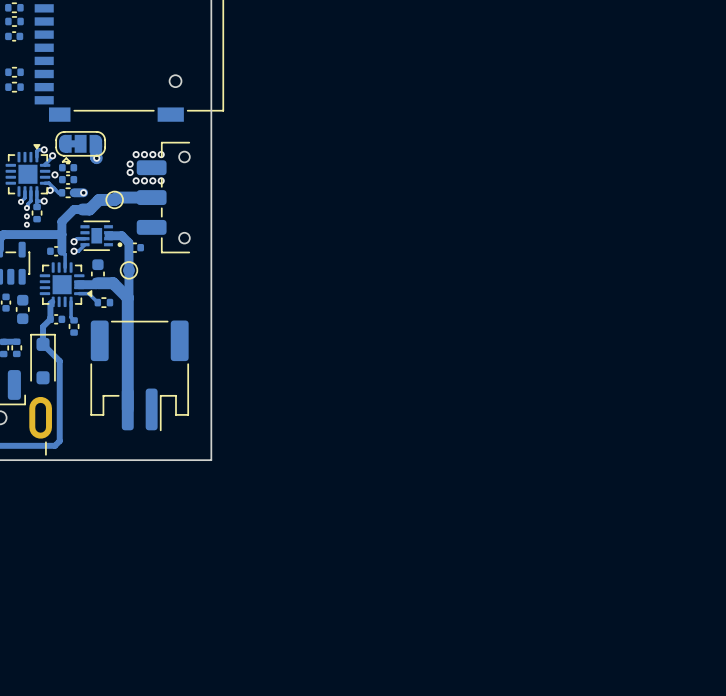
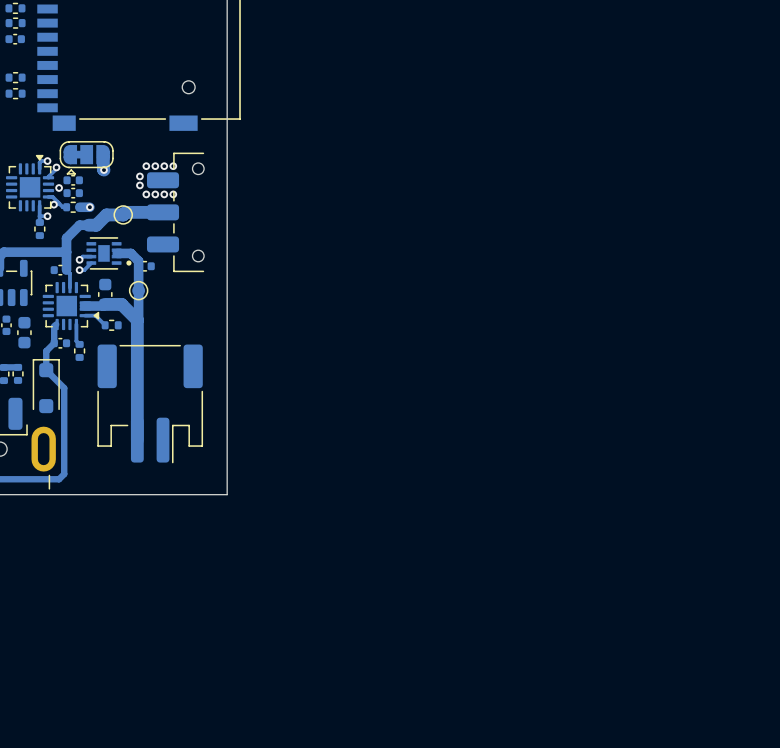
track: (24, 191) (24, 197) (20, 201) -> none
track: (30, 191) (30, 201) (26, 208) -> none
via: (20, 201) -> none
via: (26, 208) -> none
via: (26, 216) -> none
via: (26, 224) -> none

